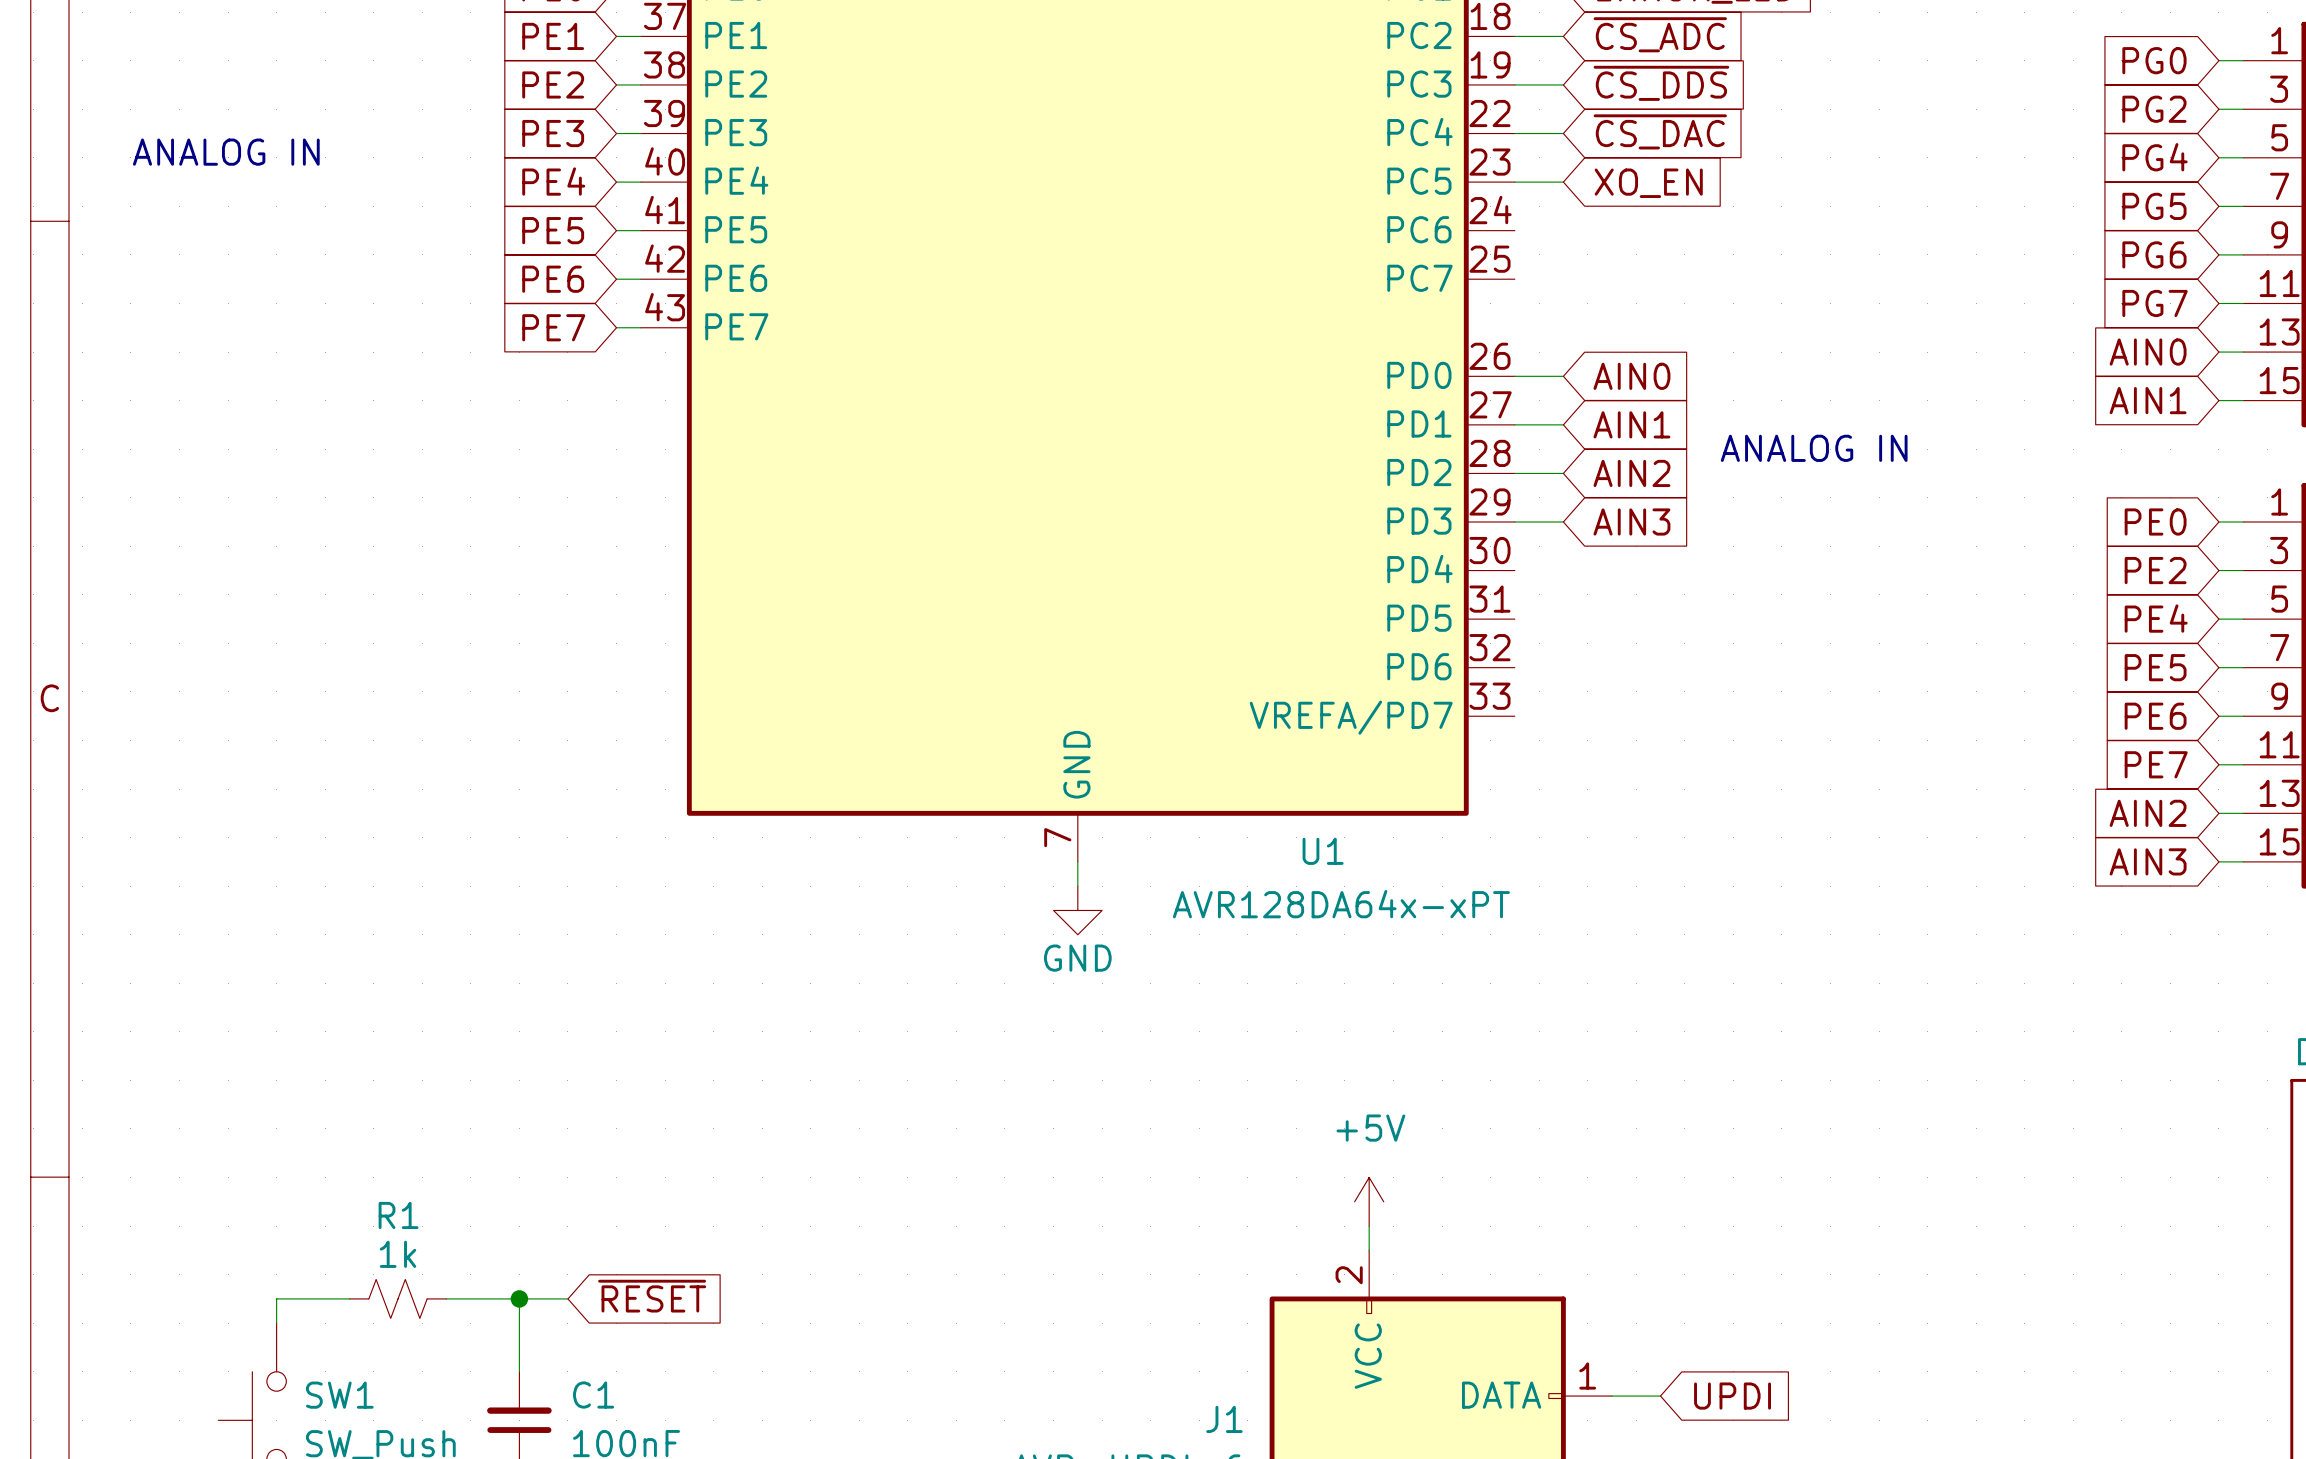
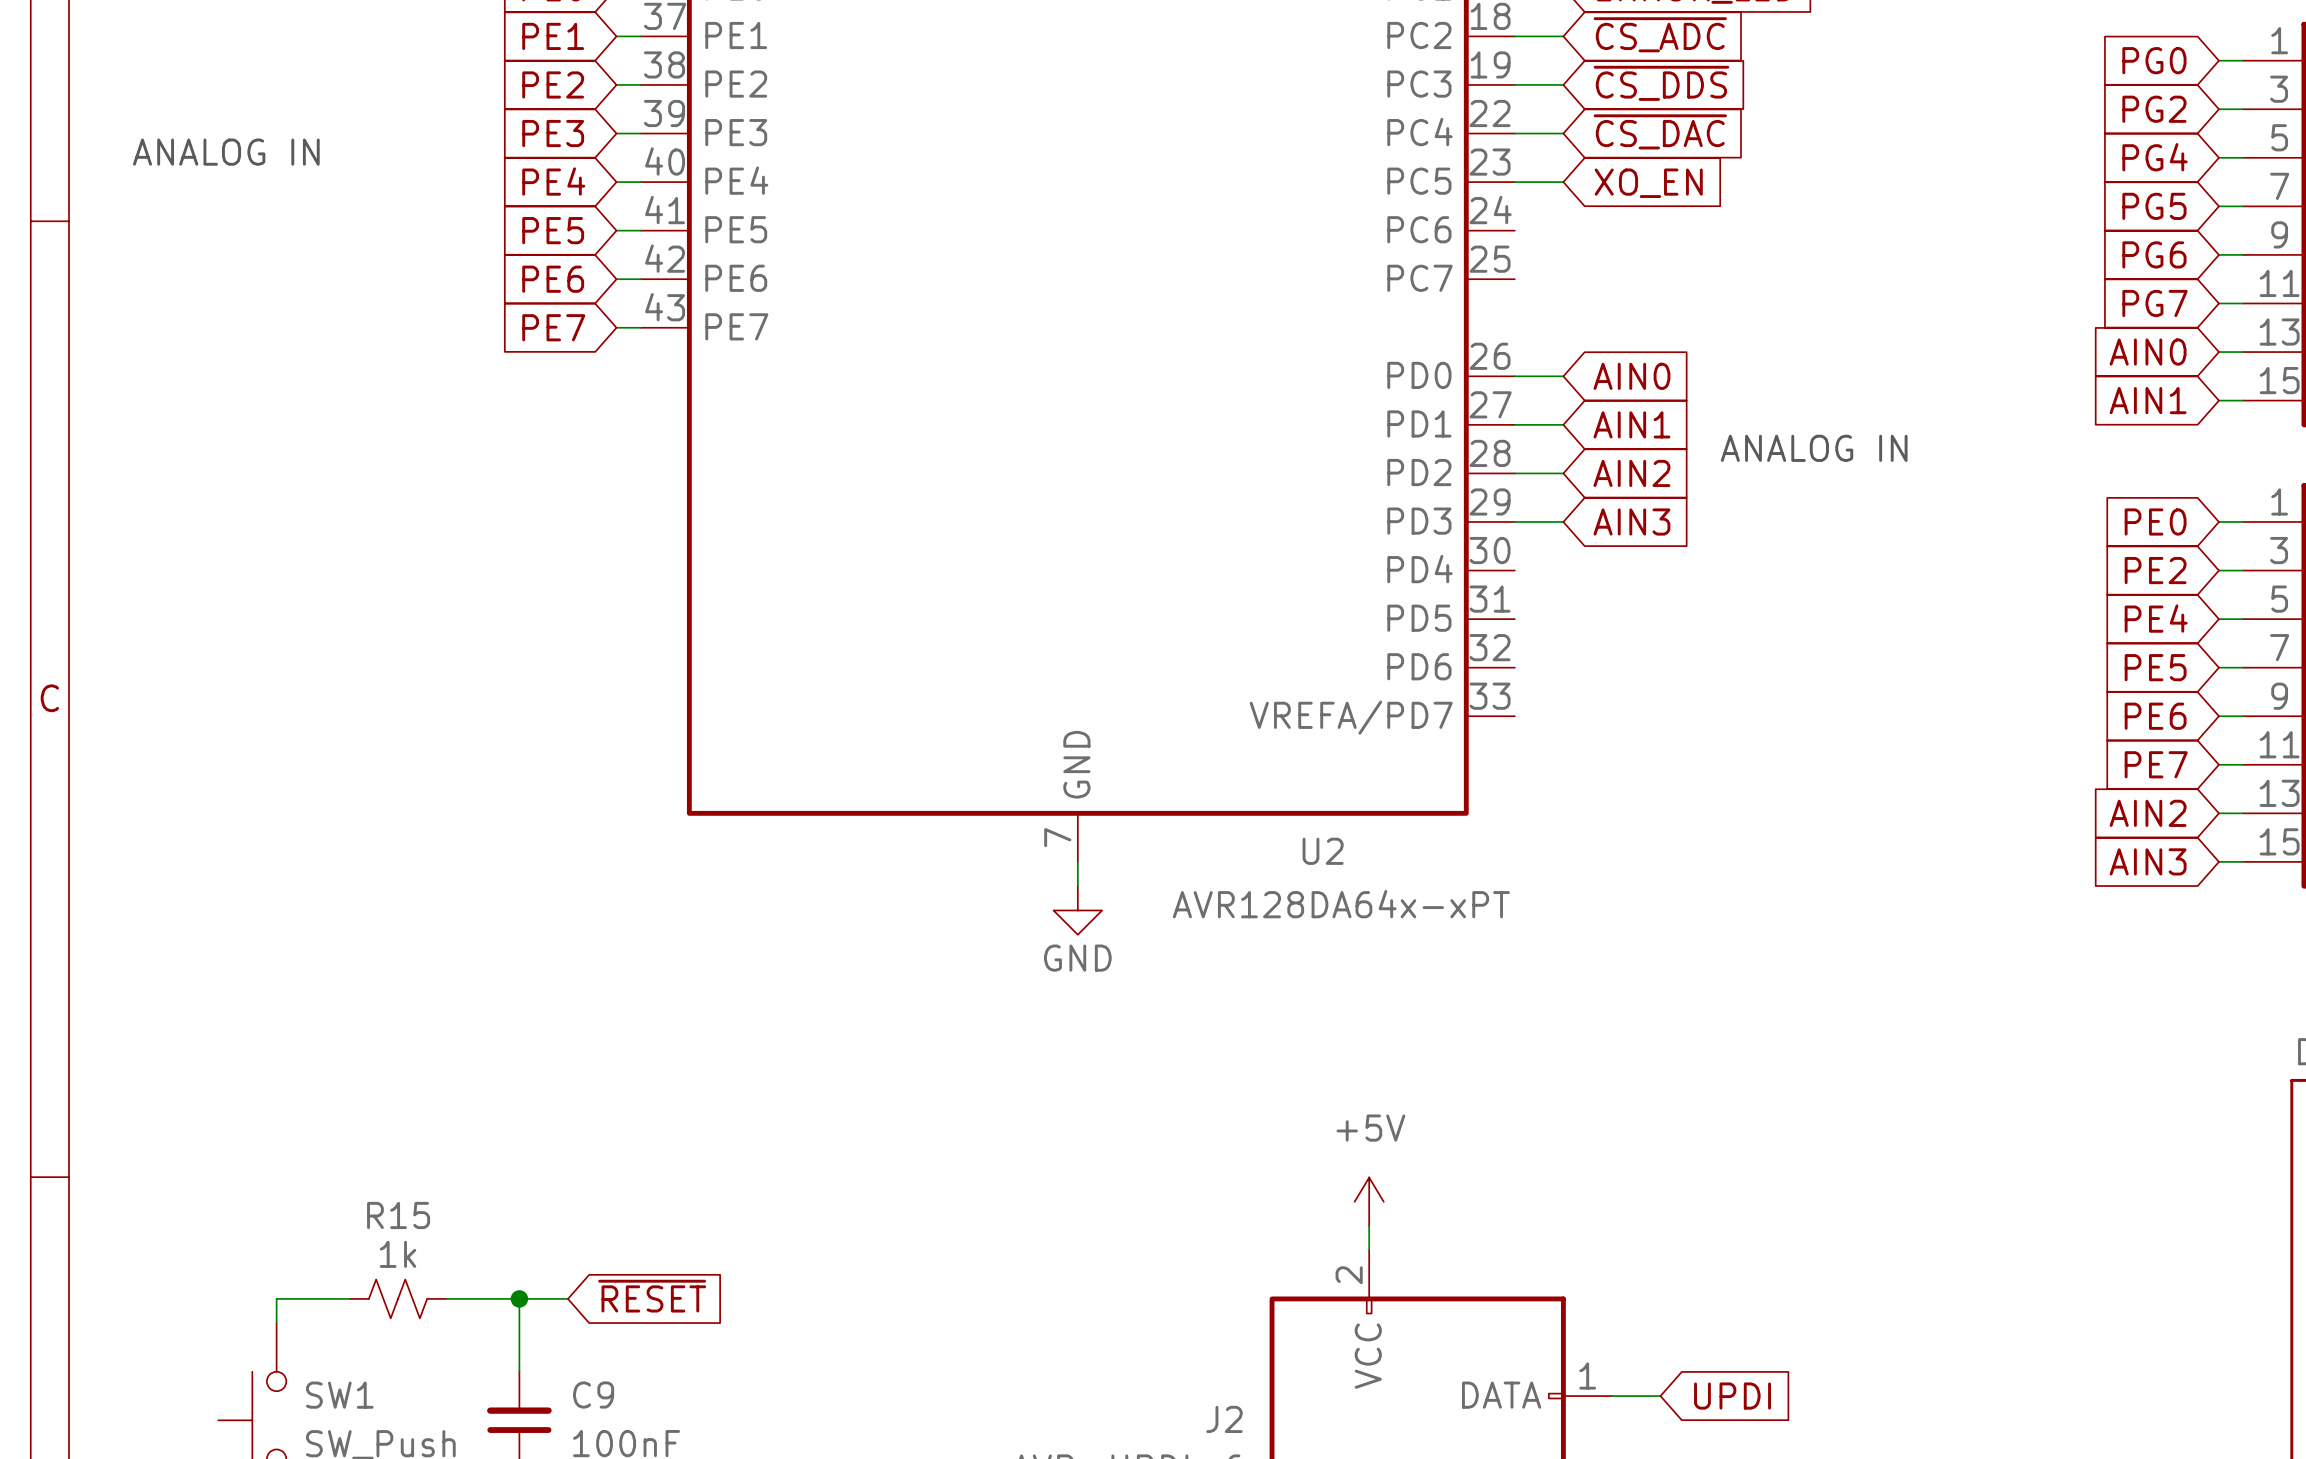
U1 name: U1 (1323, 851) -> U2 (1323, 851)
R1 name: R1 (398, 1215) -> R15 (398, 1215)
C1 name: C1 (593, 1395) -> C9 (593, 1395)
J1 name: J1 (1224, 1419) -> J2 (1224, 1419)

